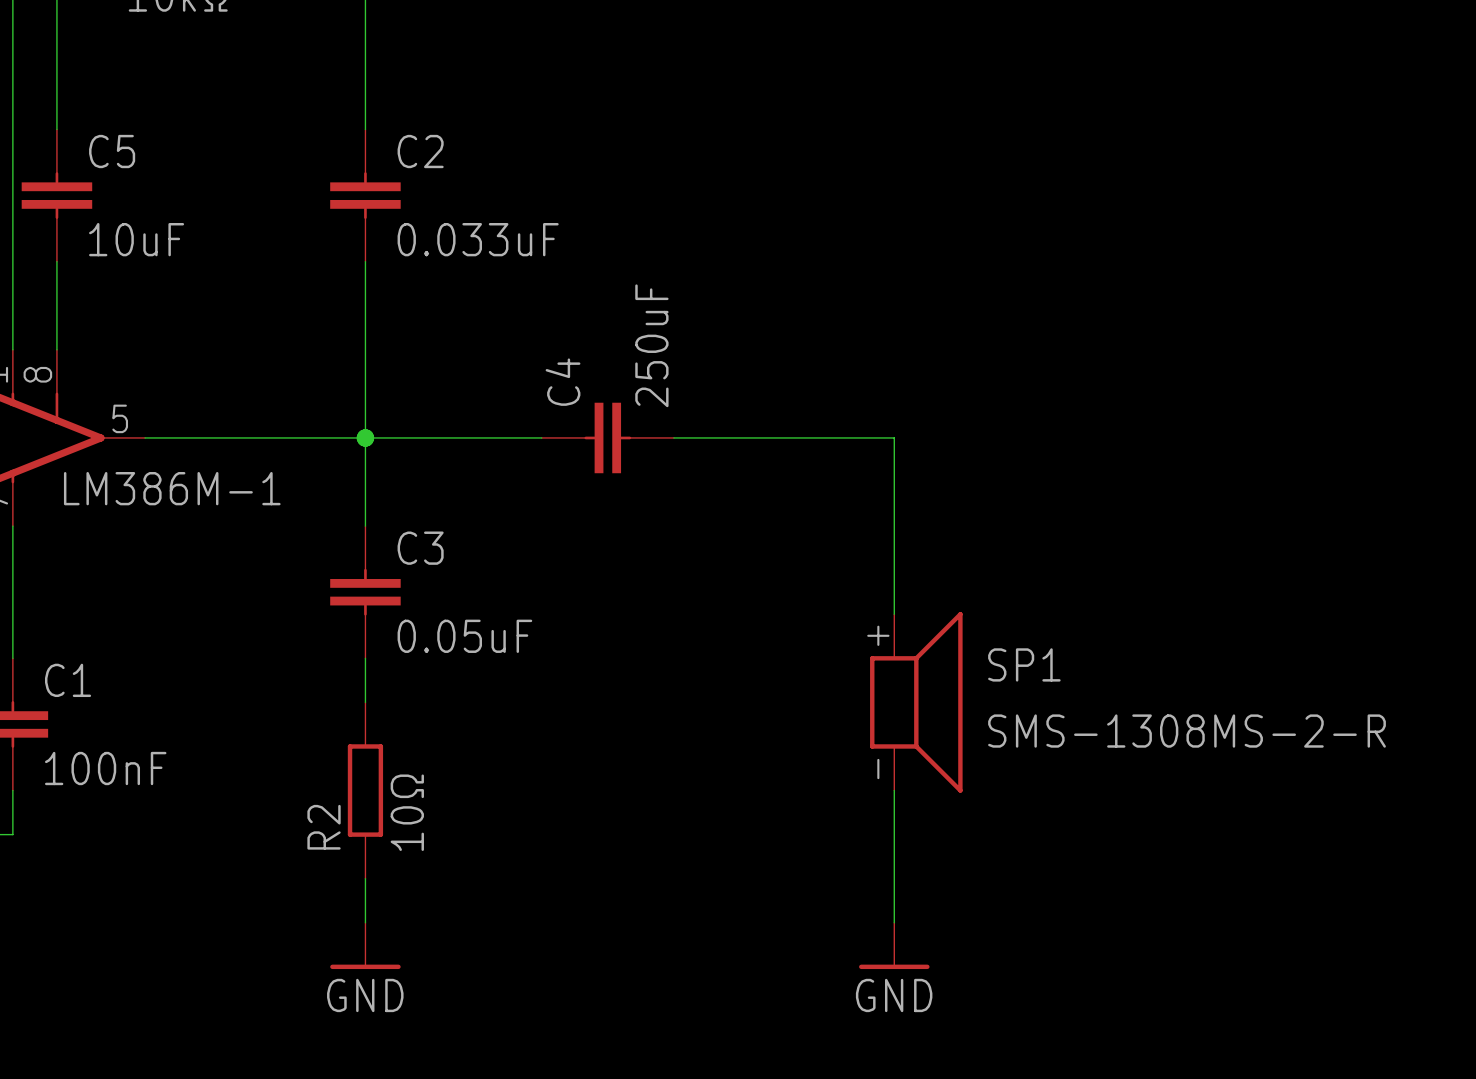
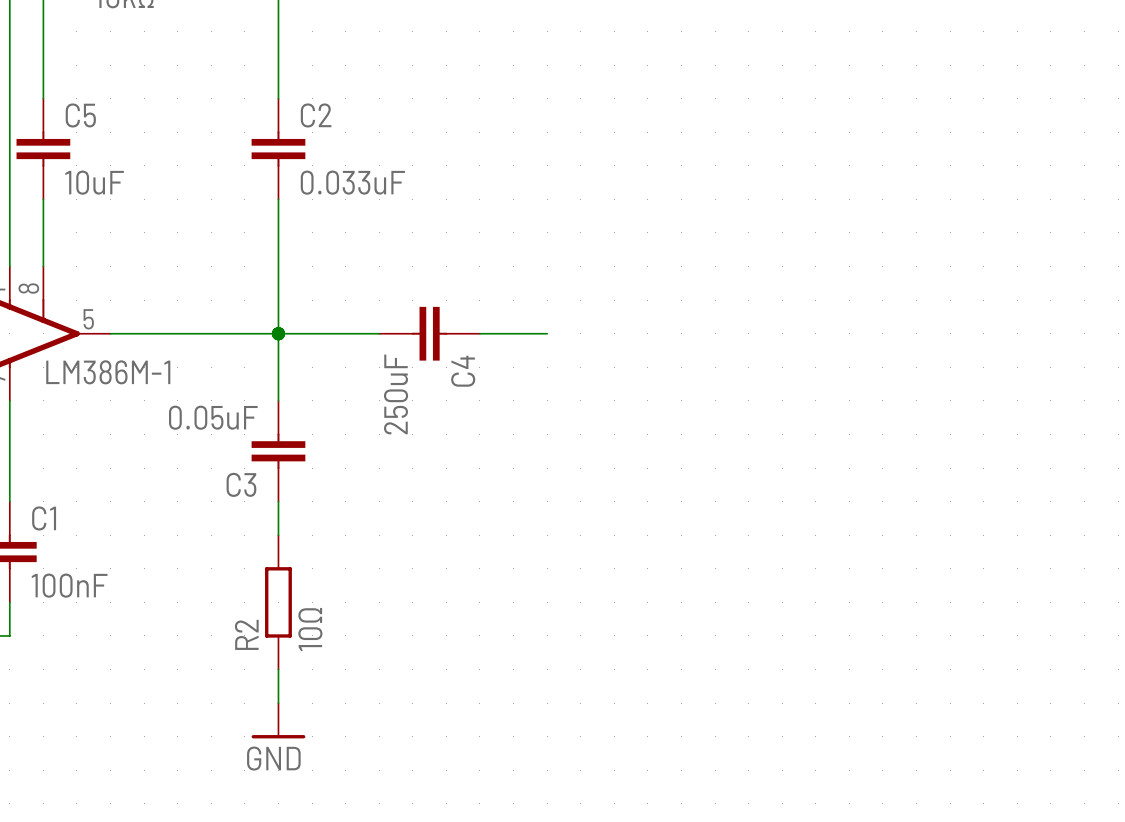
C4 value position: 250uF (651, 345) -> 250uF (396, 394)
C4 name position: C4 (563, 382) -> C4 (463, 371)
C4 position: (607, 437) -> (429, 333)
wire: (718, 437) (894, 437) (894, 614) -> none
C3 name position: C3 (420, 548) -> C3 (241, 484)
C3 value position: 0.05uF (464, 636) -> 0.05uF (213, 417)
SP1: SMS-1308MS-2-R (916, 702) -> none
wire: (894, 790) (894, 922) -> none
power symbol: GND (894, 945) -> none

